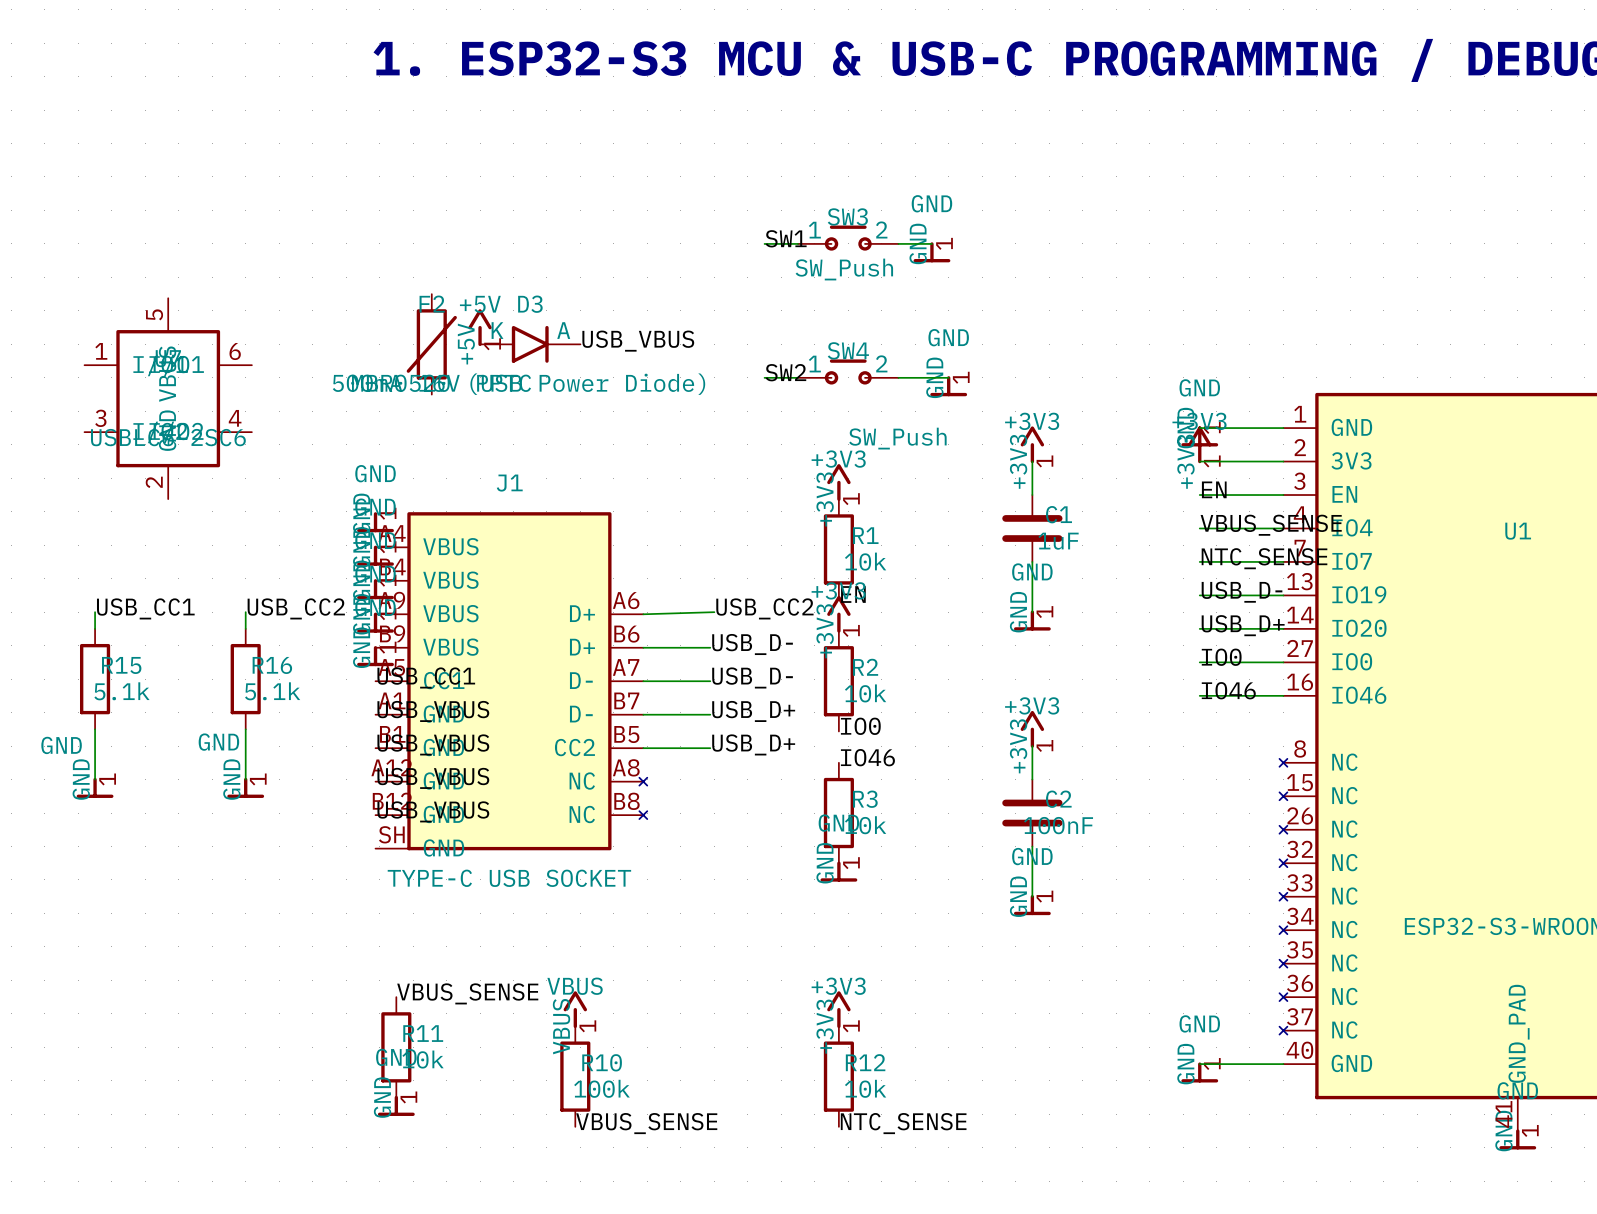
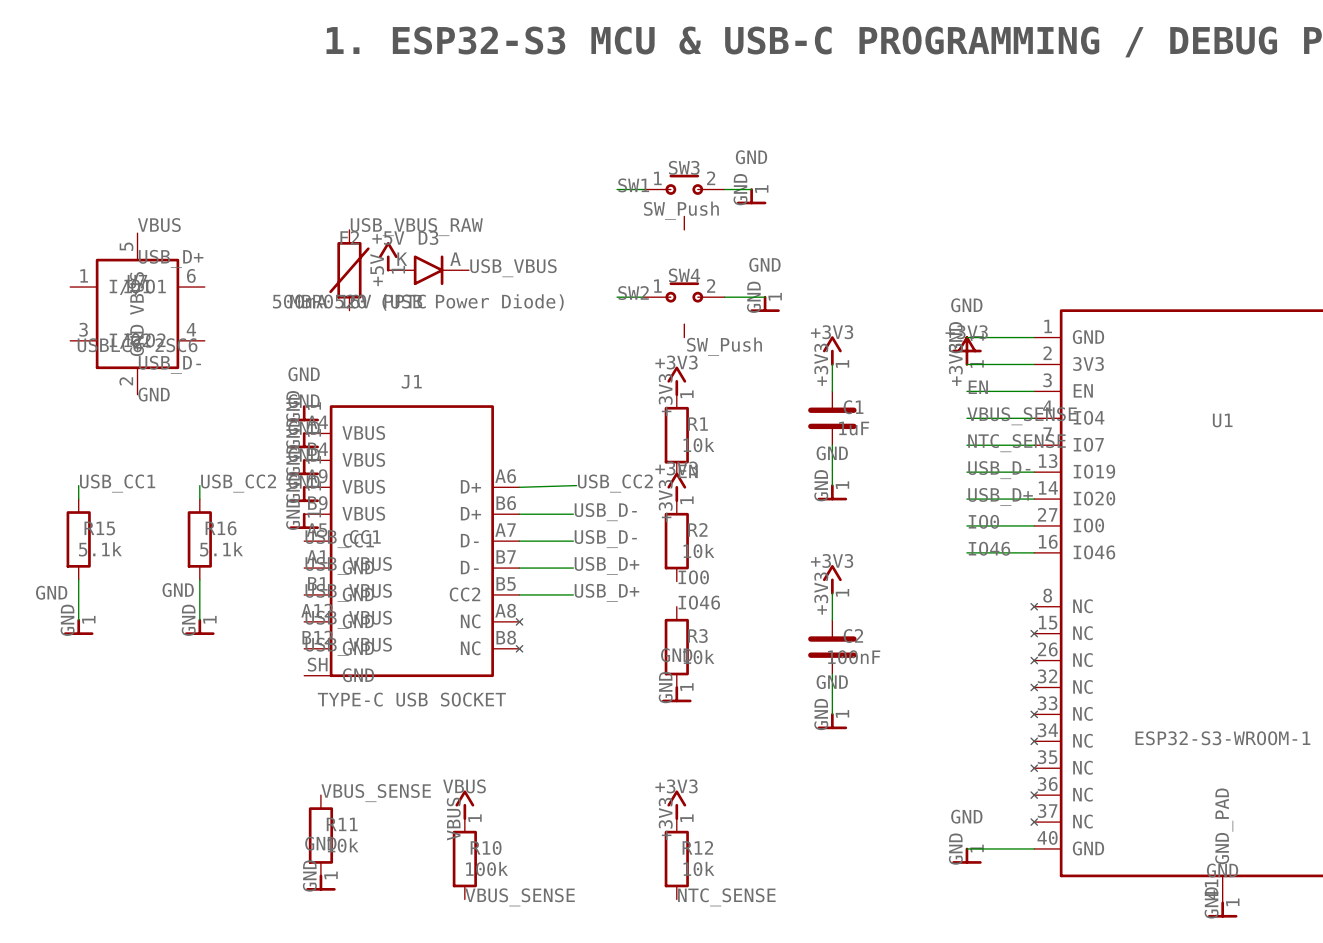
SW3 symbol: [798, 225, 899, 251] -> [643, 174, 725, 230]
label: none -> VBUS (159, 225)
label: none -> USB_VBUS_RAW (416, 227)
label: none -> USB_D+ (171, 258)
SW4 symbol: [798, 359, 899, 385] -> [643, 282, 725, 338]
label: none -> USB_D- (169, 364)
label: none -> GND (154, 394)

